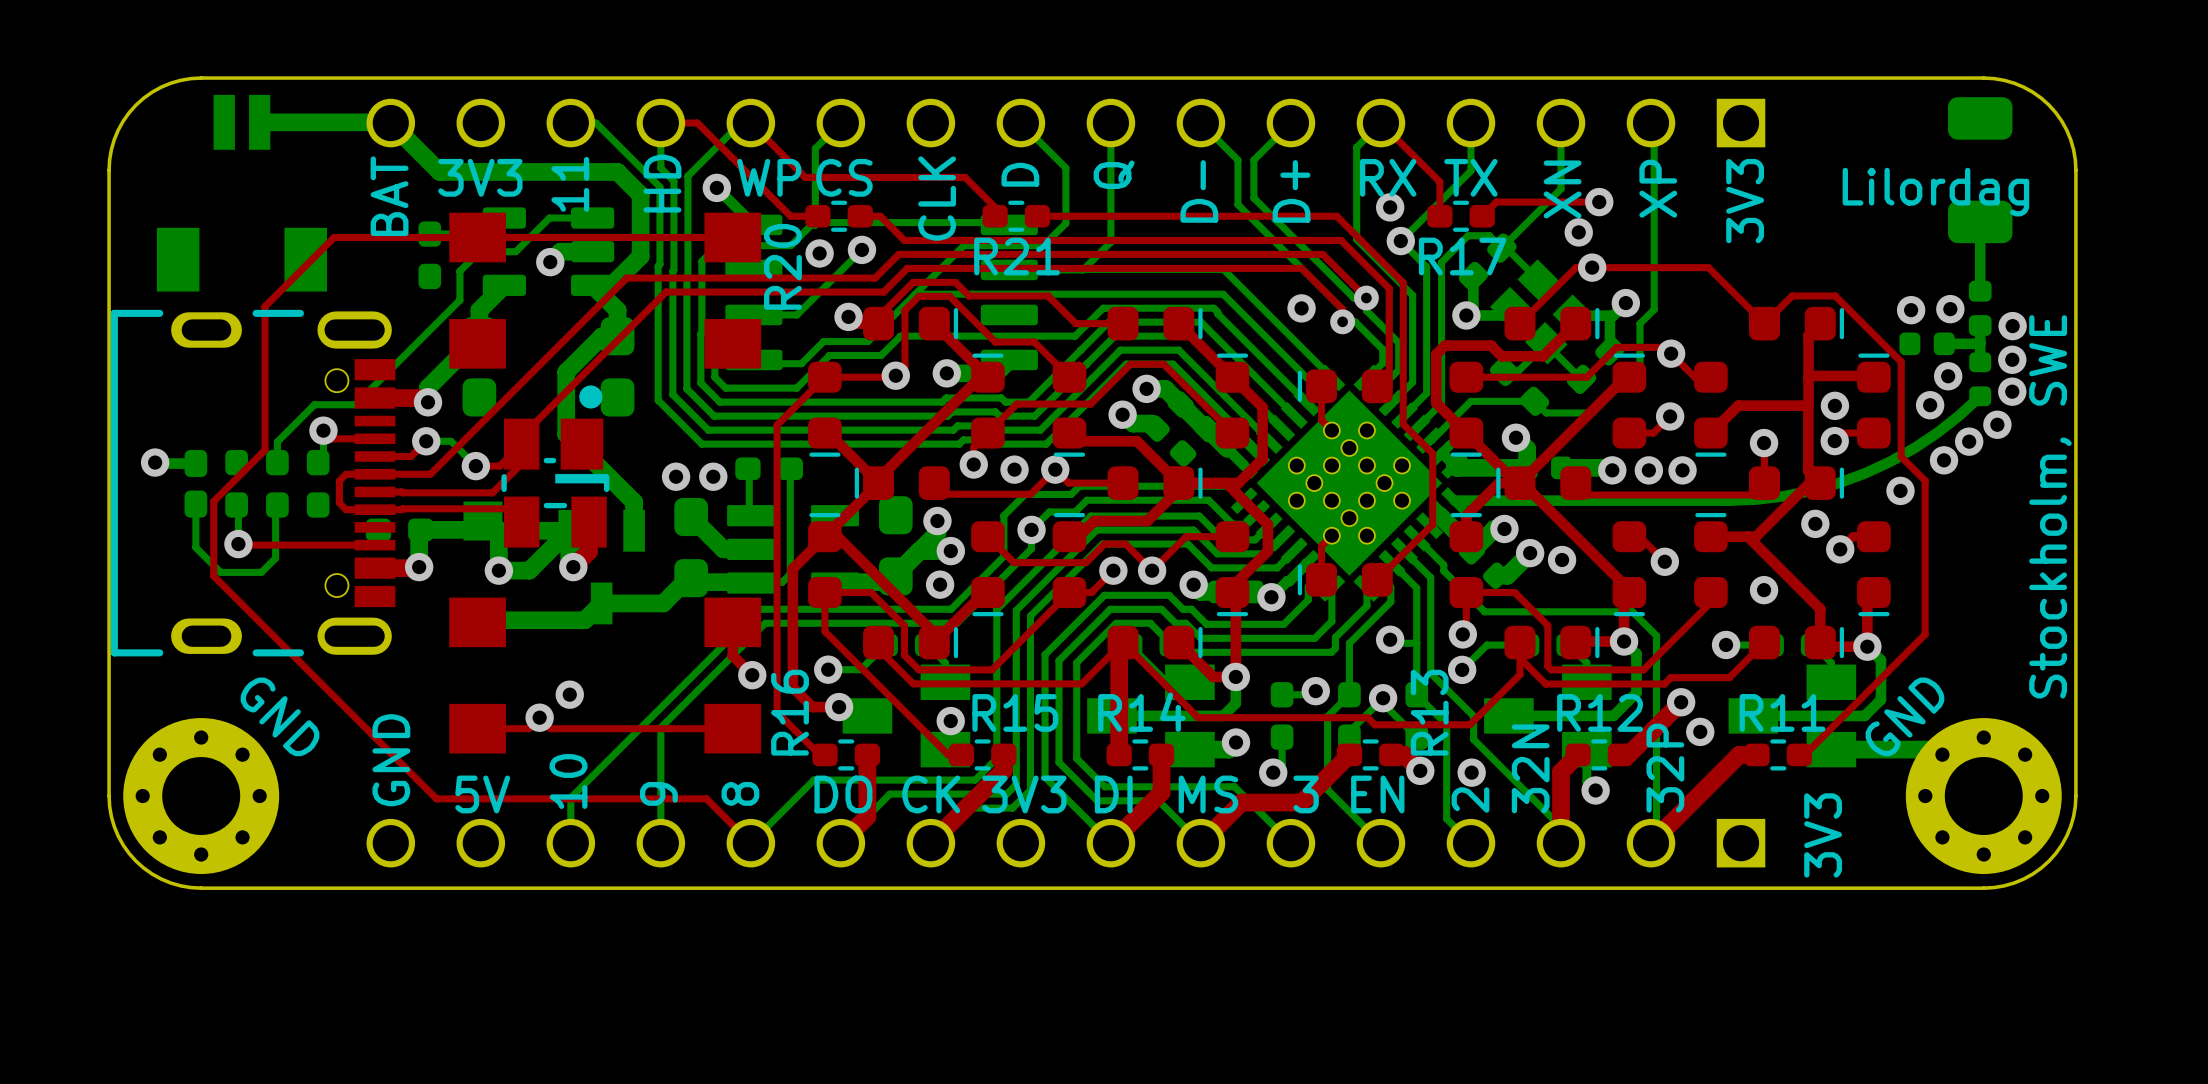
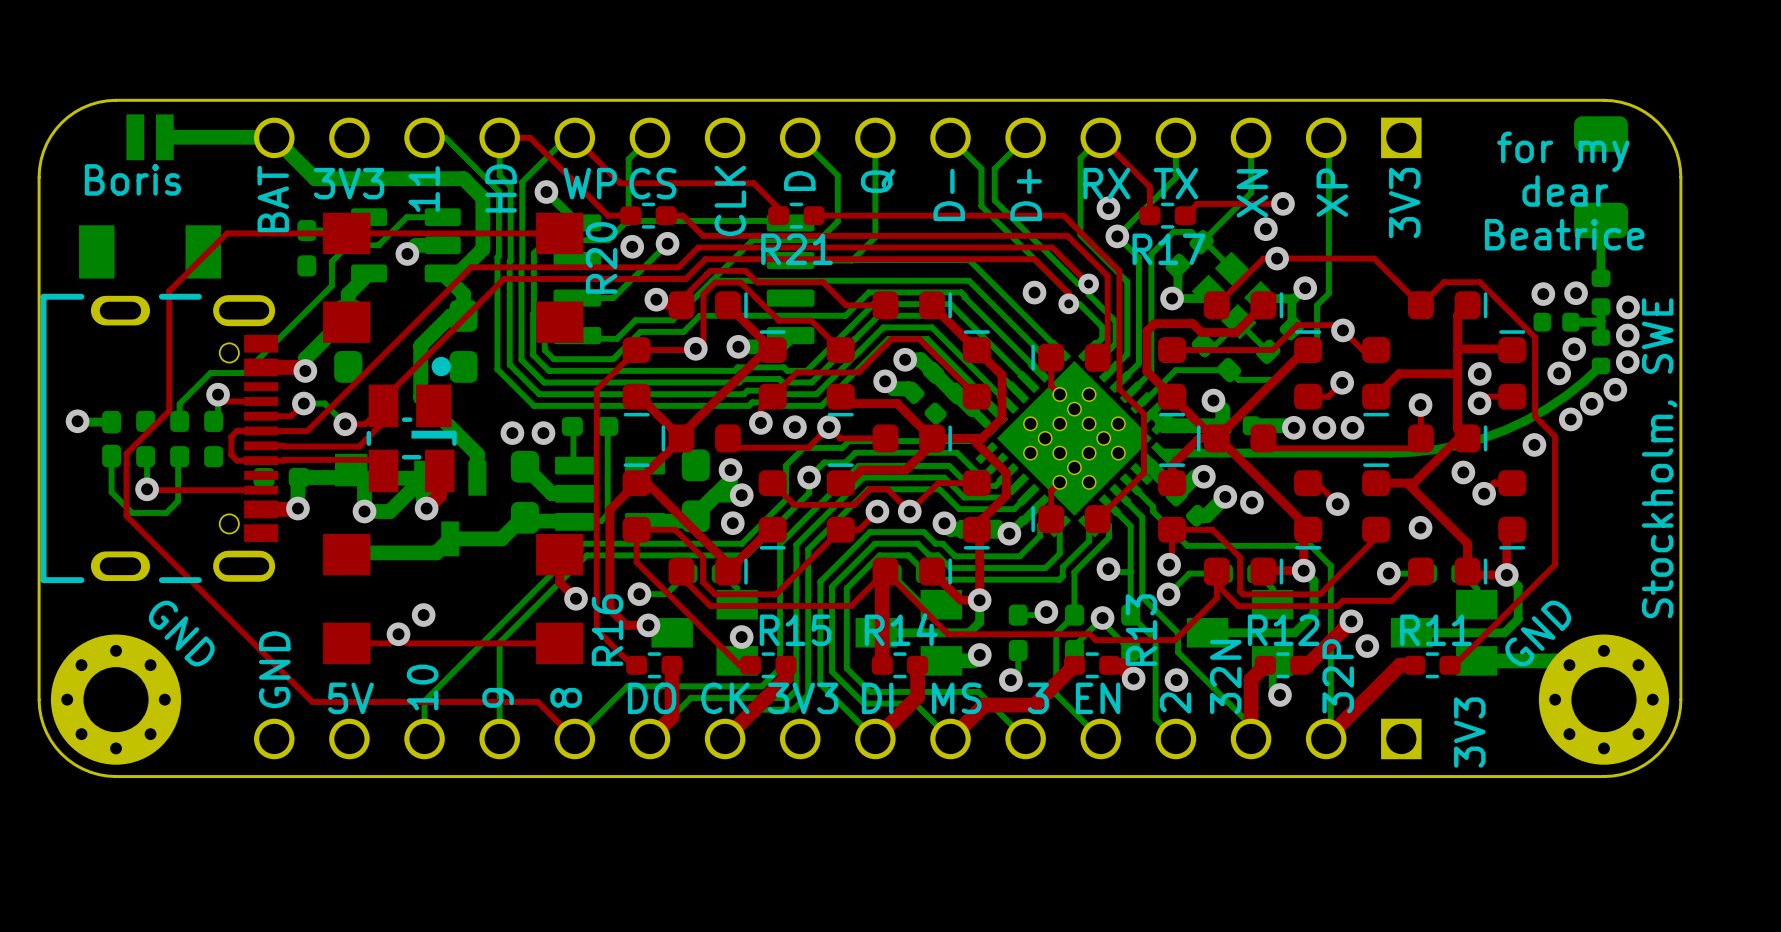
text: none -> for my (1563, 151)
text: none -> Boris (132, 179)
text: Lilordag (1935, 192) -> dear (1565, 191)
text: none -> Beatrice (1564, 234)

